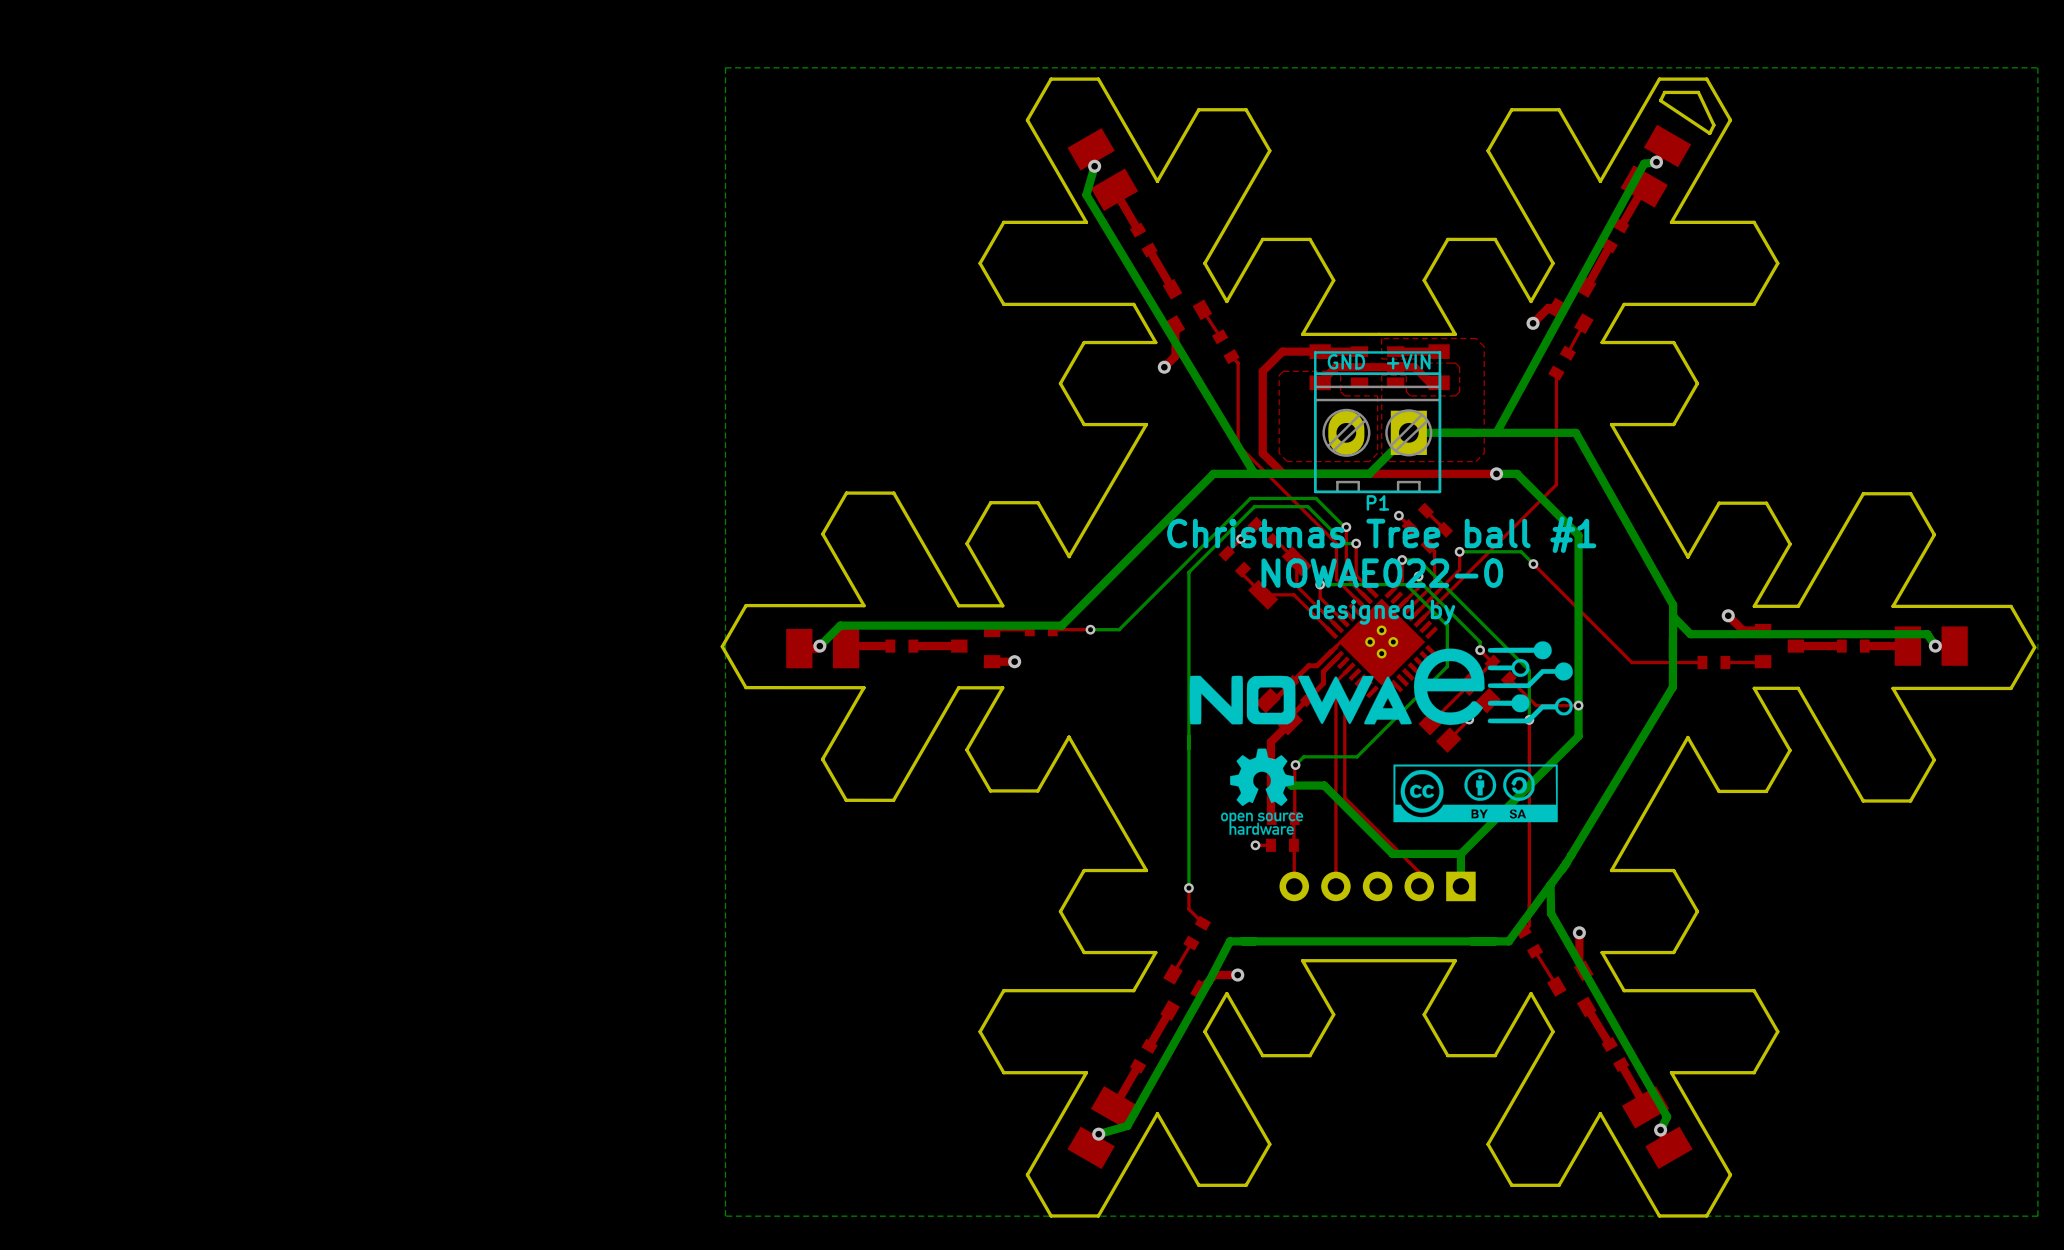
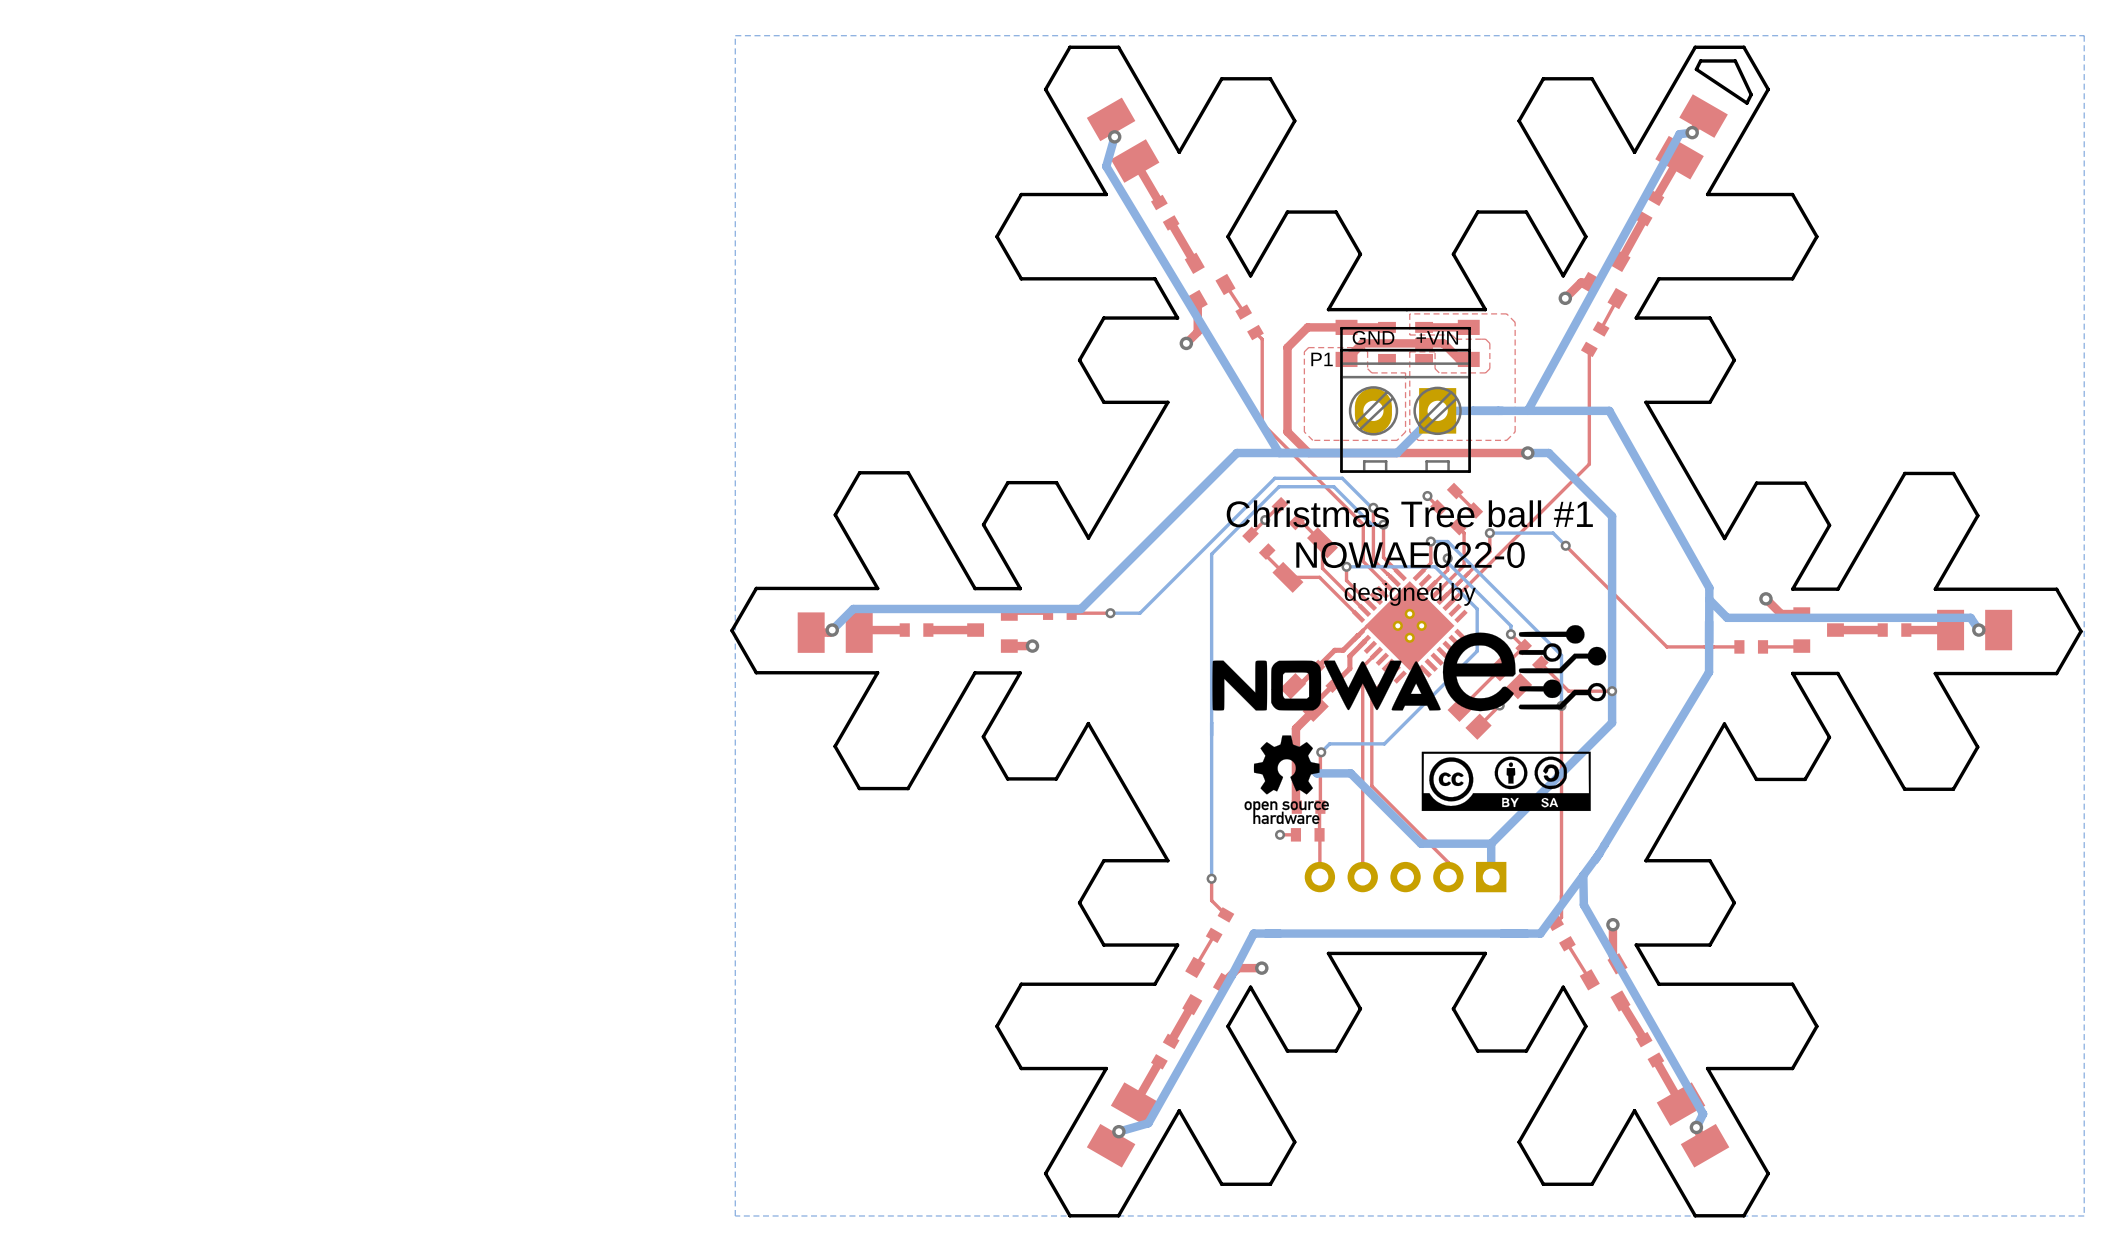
P1 name position: P1 (1377, 502) -> P1 (1322, 359)

